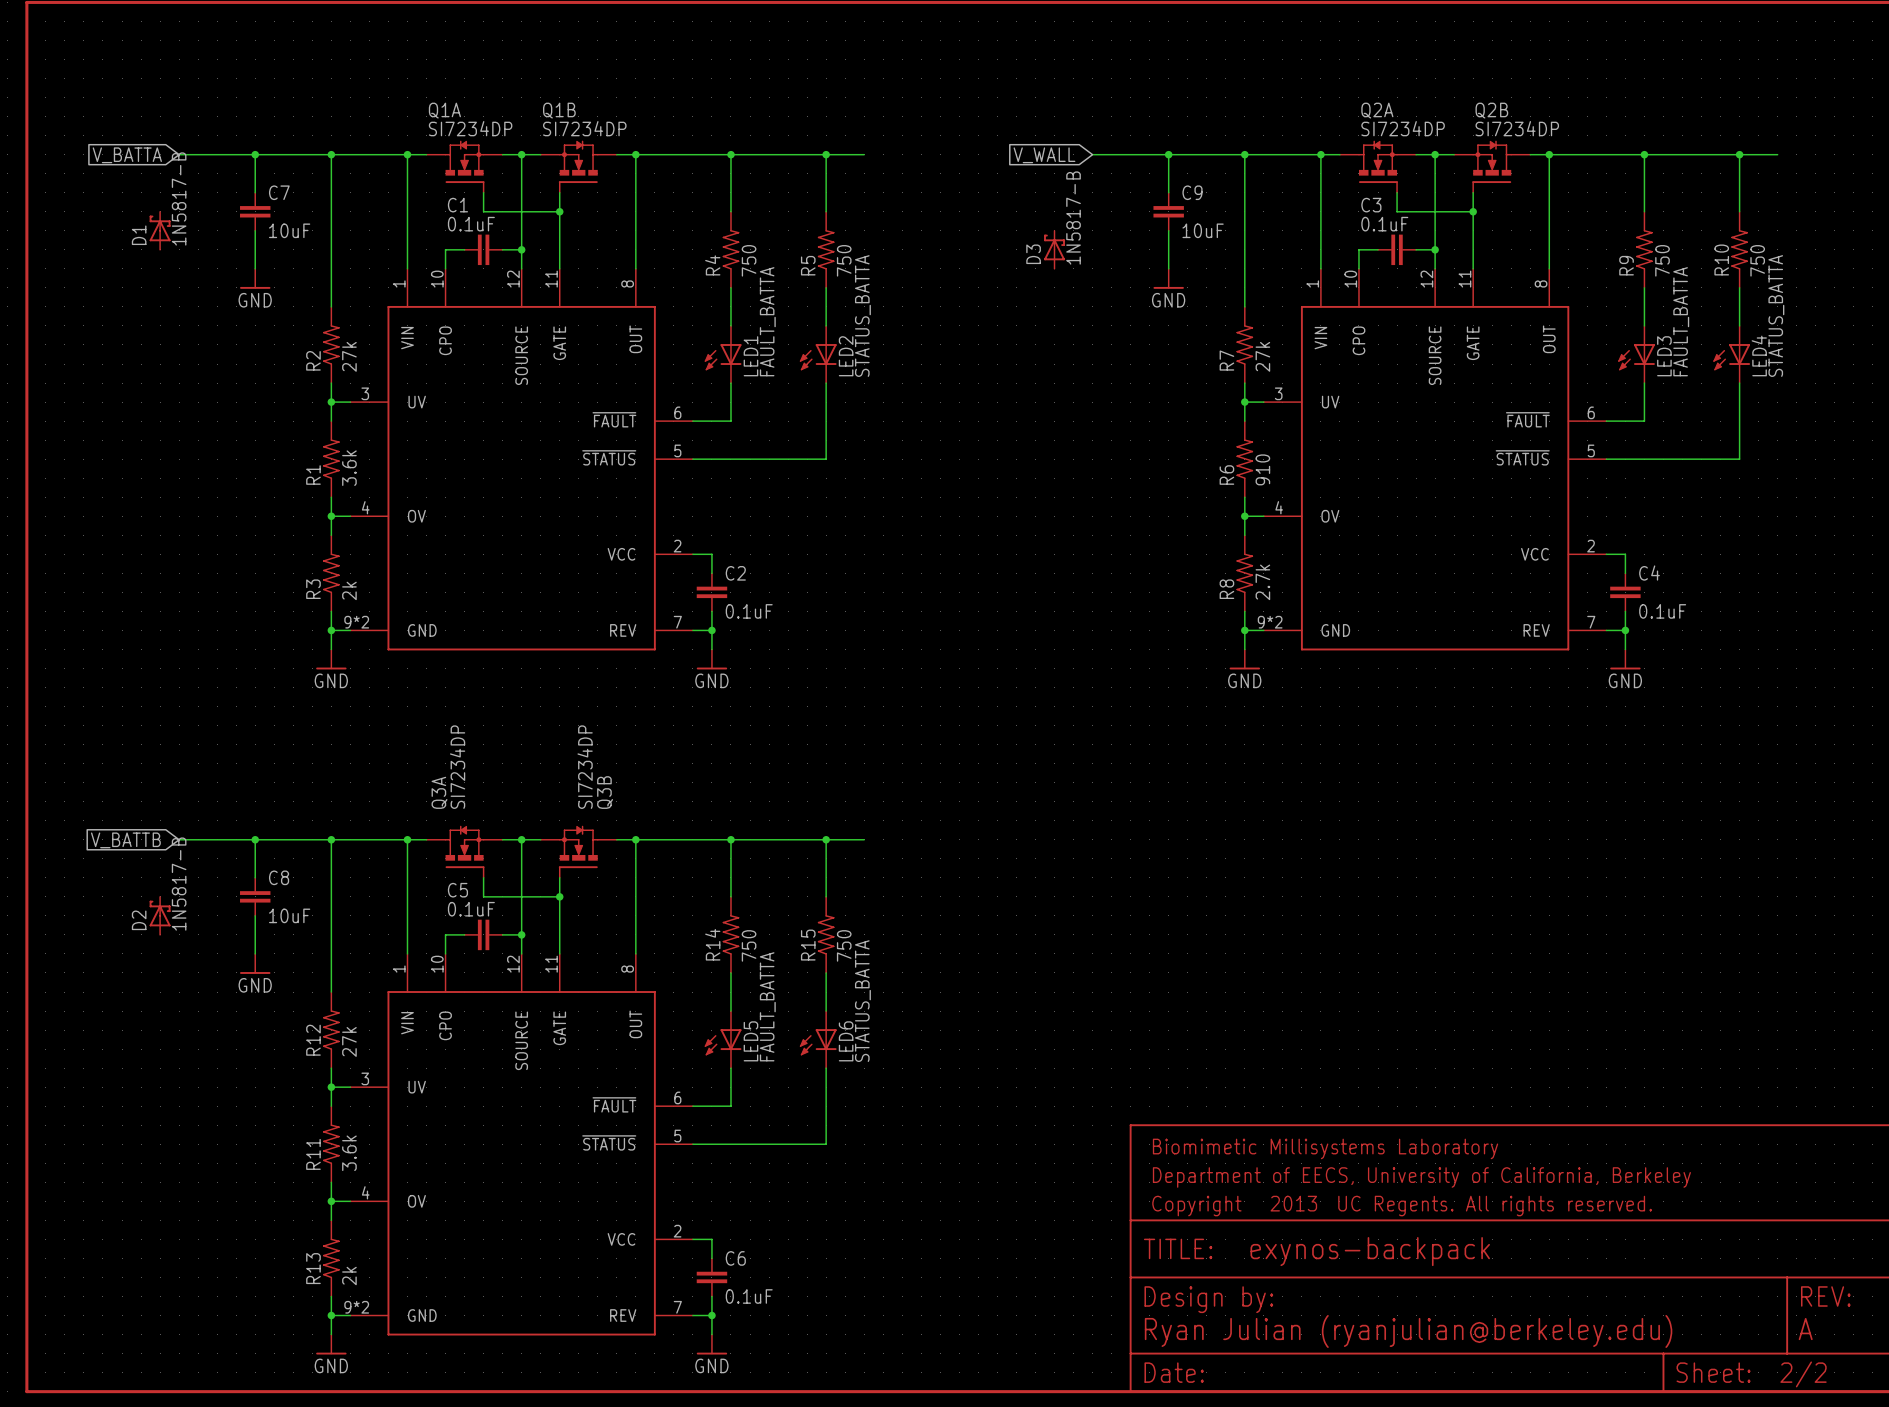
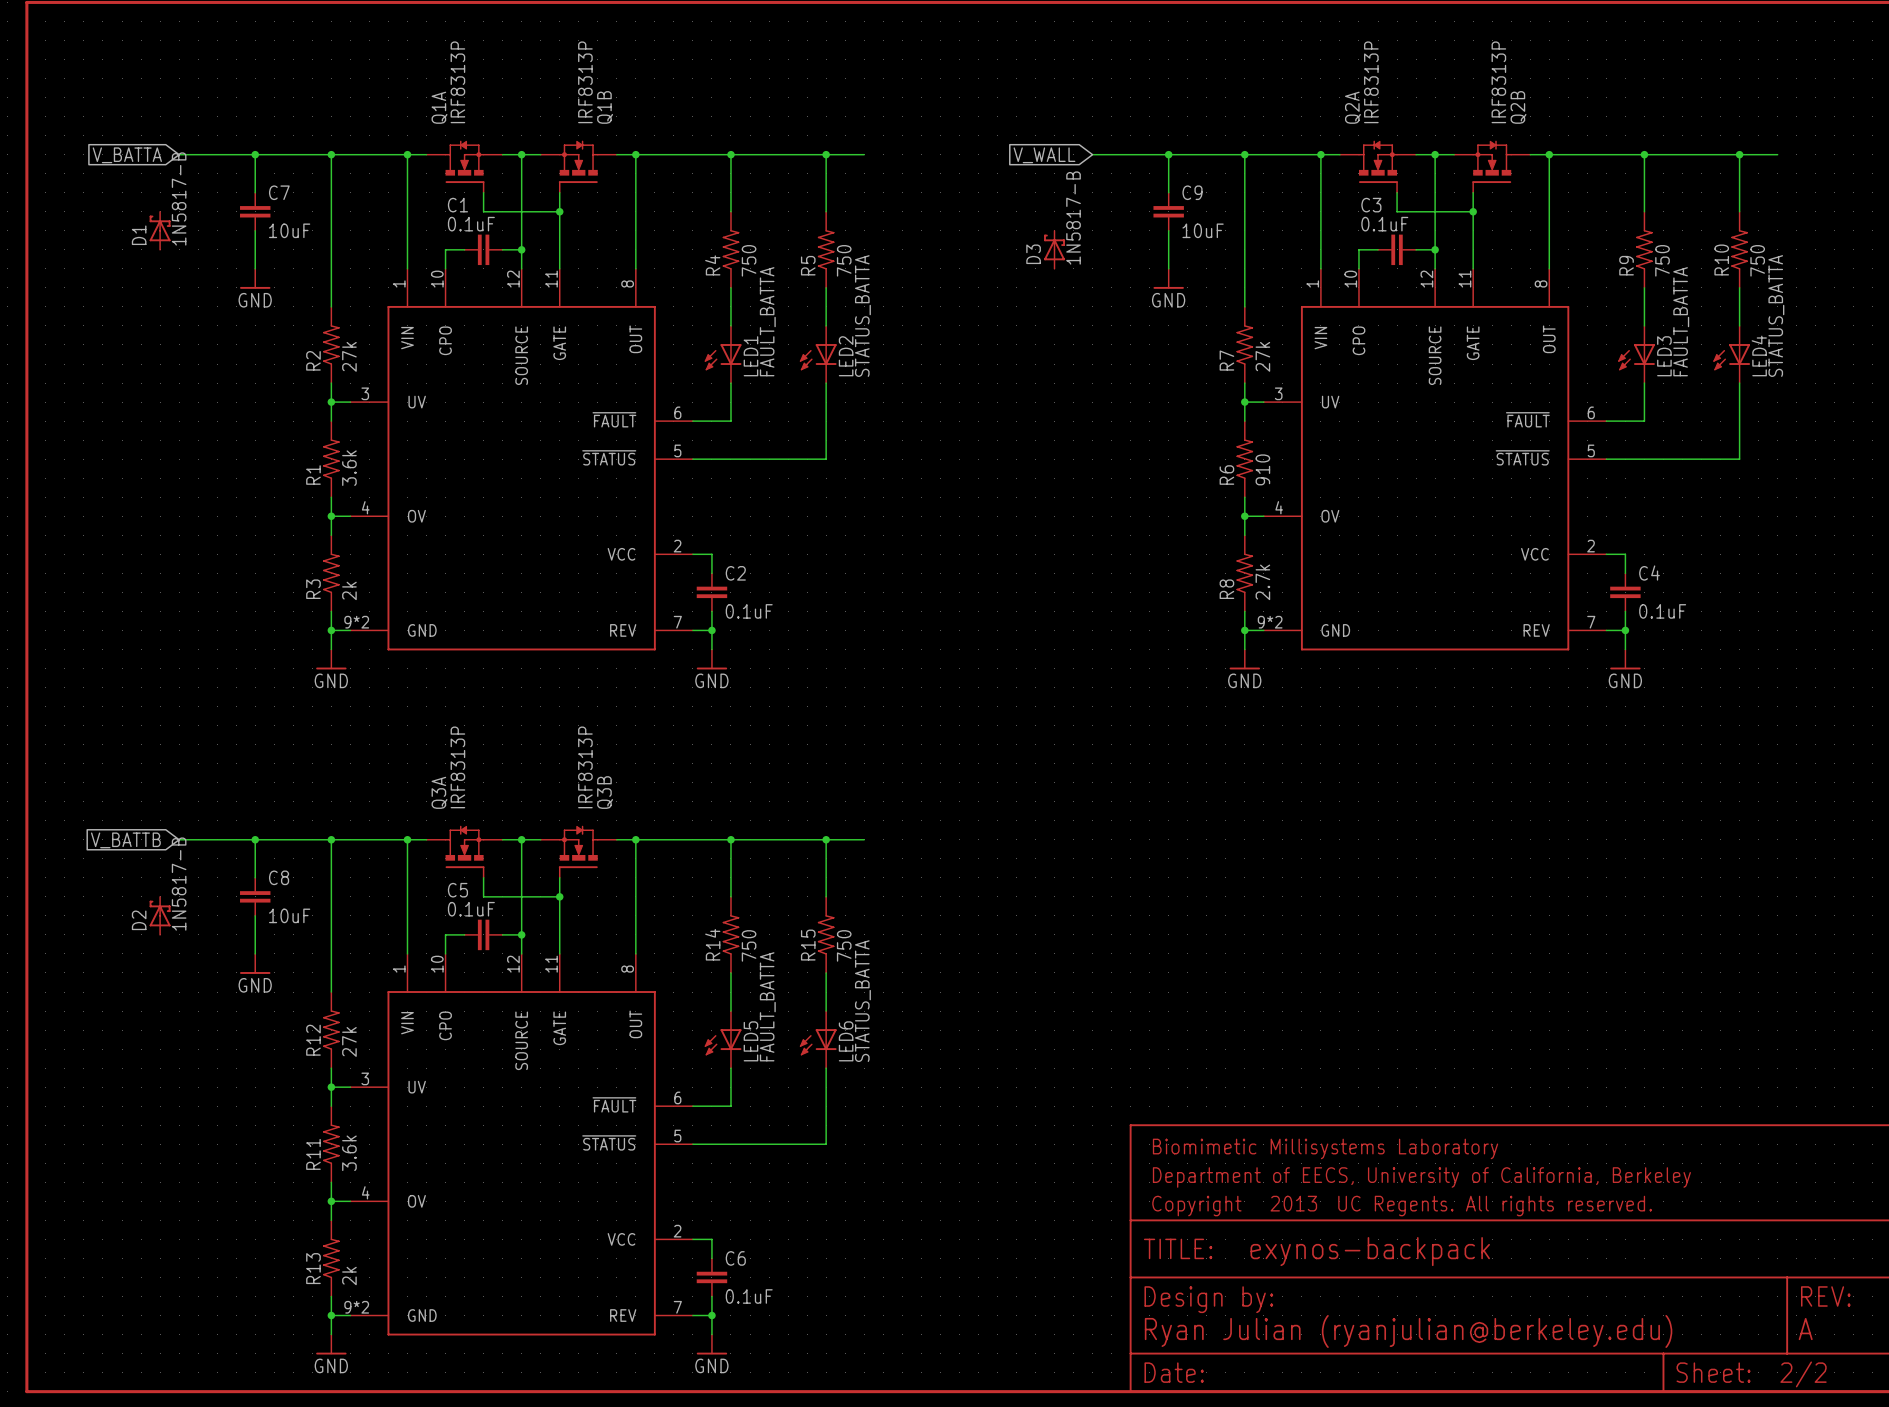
Q1A name rotation: 0° (444, 110) -> 90° counterclockwise (439, 107)
Q1B name rotation: 0° (559, 110) -> 90° counterclockwise (605, 107)
Q1B name position: Q1B (559, 110) -> Q1B (605, 107)
Q2A name rotation: 0° (1377, 110) -> 90° counterclockwise (1352, 107)
Q2B name rotation: 0° (1491, 110) -> 90° counterclockwise (1518, 107)
Q1A value: SI7234DP (470, 128) -> IRF8313P (457, 82)
Q1B value: SI7234DP (584, 128) -> IRF8313P (585, 82)
Q2A value: SI7234DP (1403, 128) -> IRF8313P (1371, 82)
Q2B value: SI7234DP (1517, 128) -> IRF8313P (1498, 82)
Q3A value: SI7234DP (457, 767) -> IRF8313P (457, 767)
Q3B value: SI7234DP (585, 767) -> IRF8313P (585, 767)

